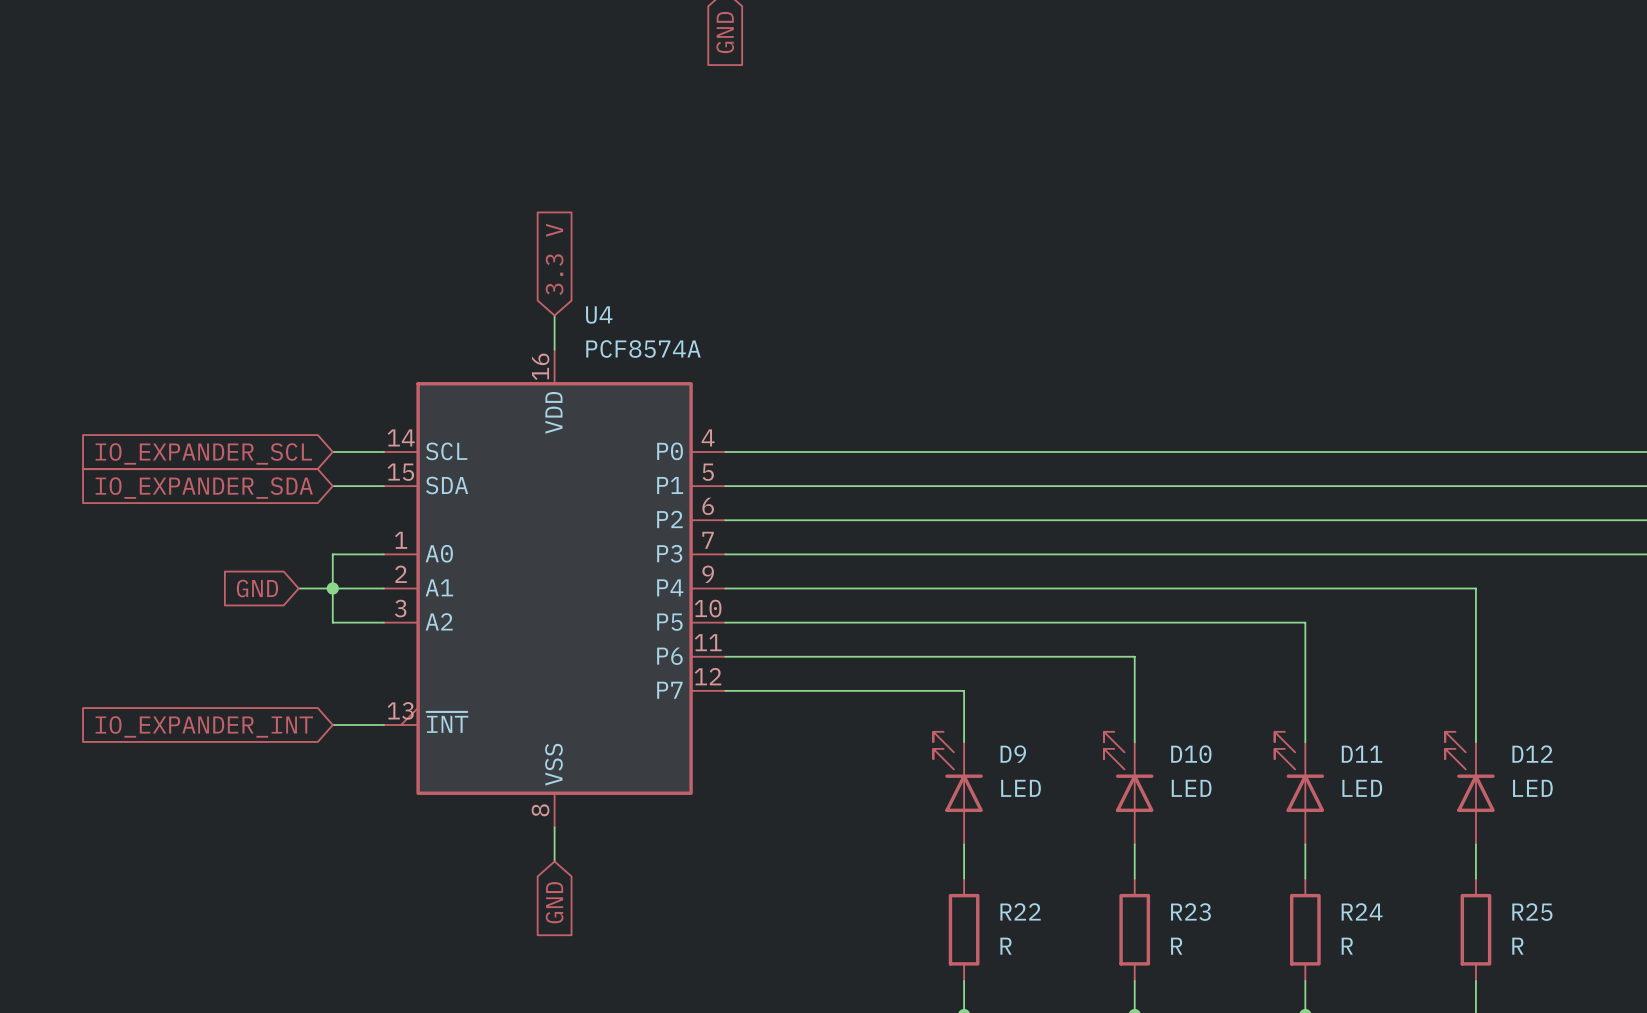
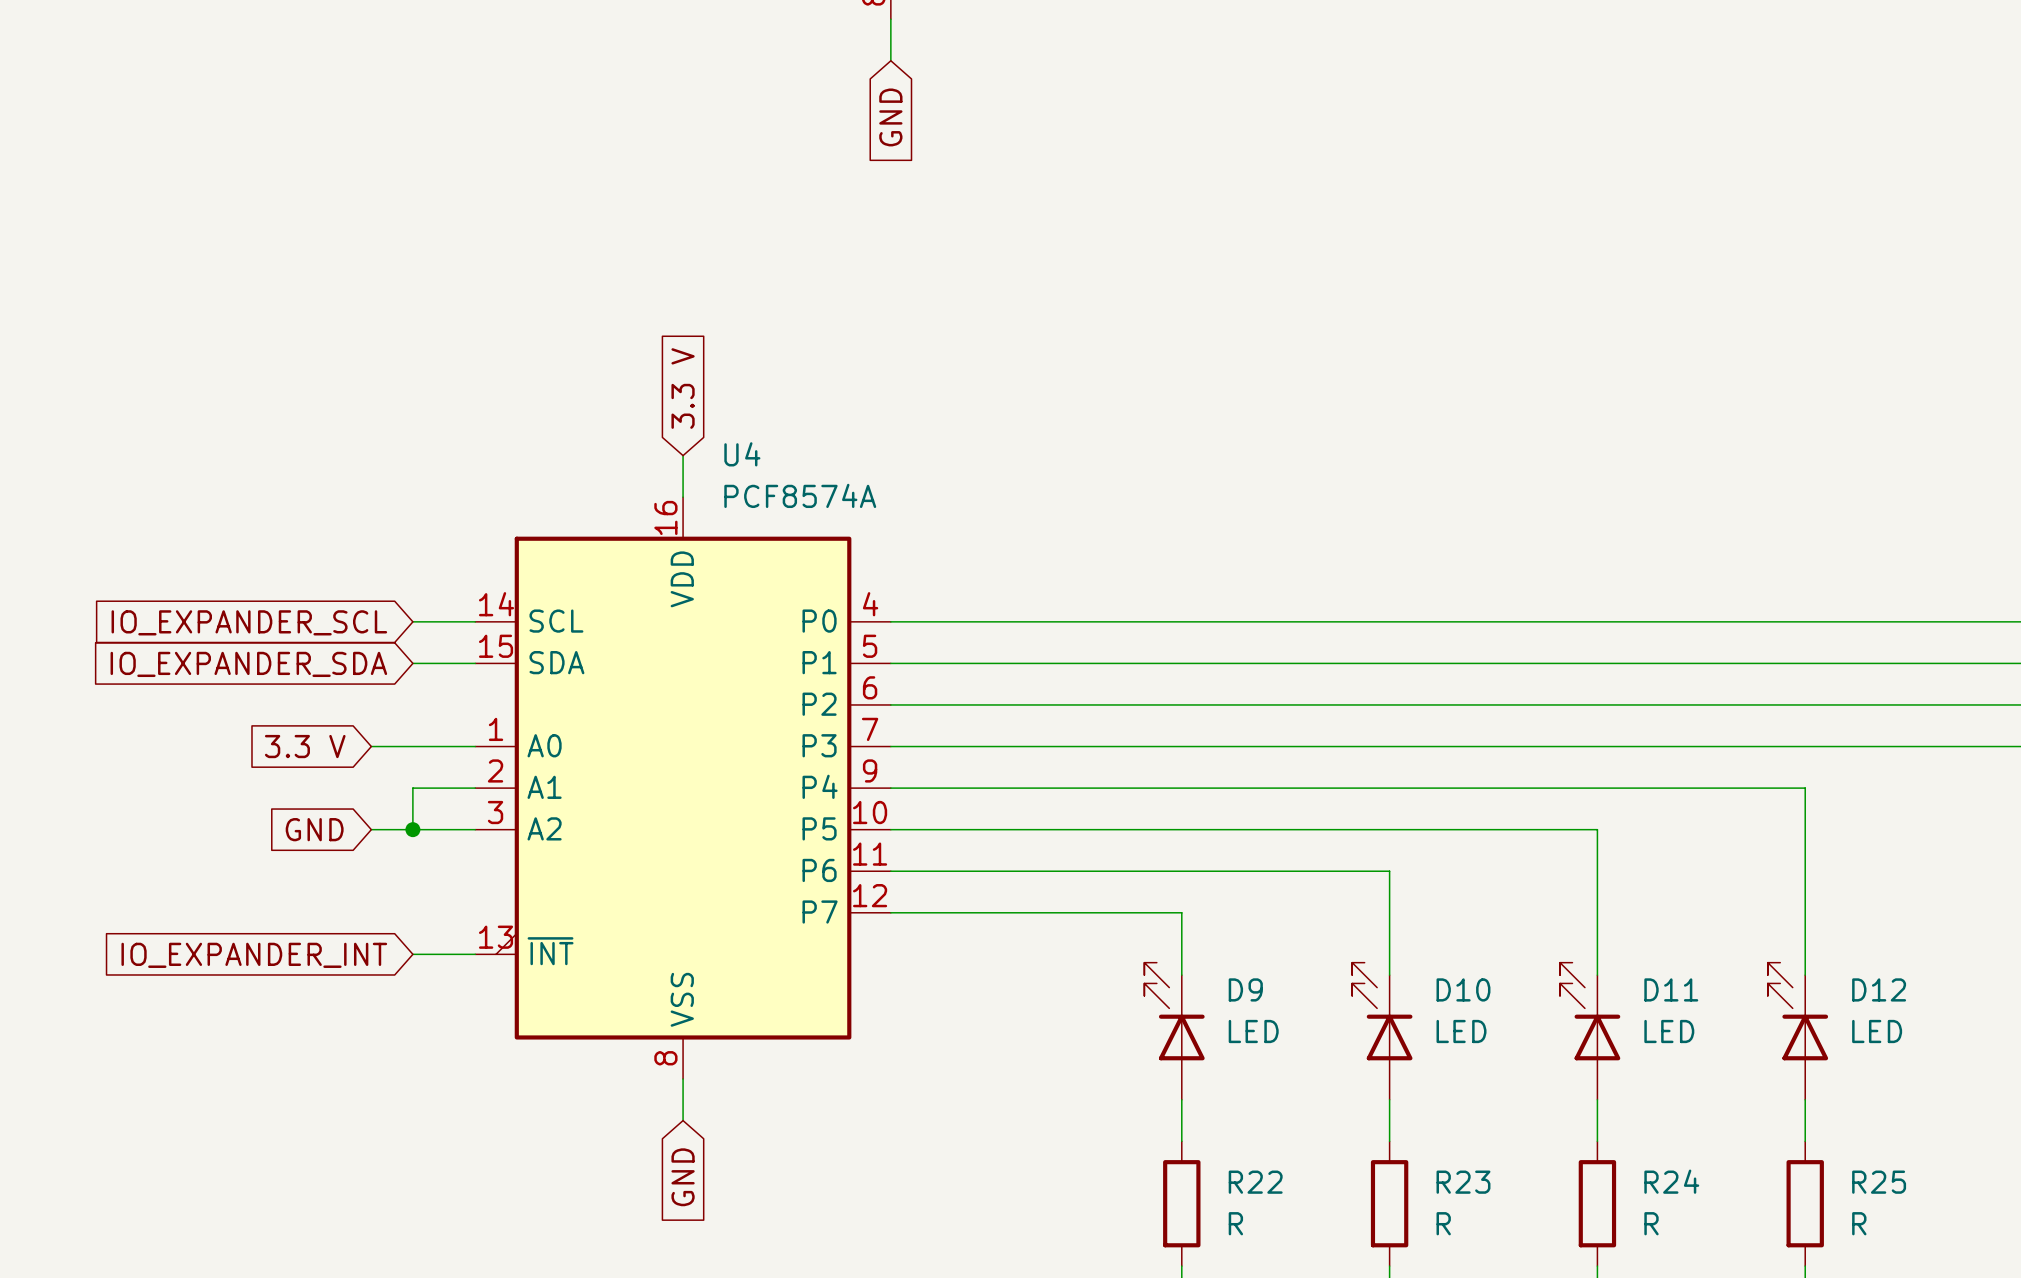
global label: none -> 3.3 V (305, 746)
wire: (332, 554) (332, 588) (298, 588) -> (412, 746) (371, 746)
global label position: GND (257, 588) -> GND (314, 829)
junction position: (332, 588) -> (412, 829)
wire: none -> (371, 829) (412, 829)

